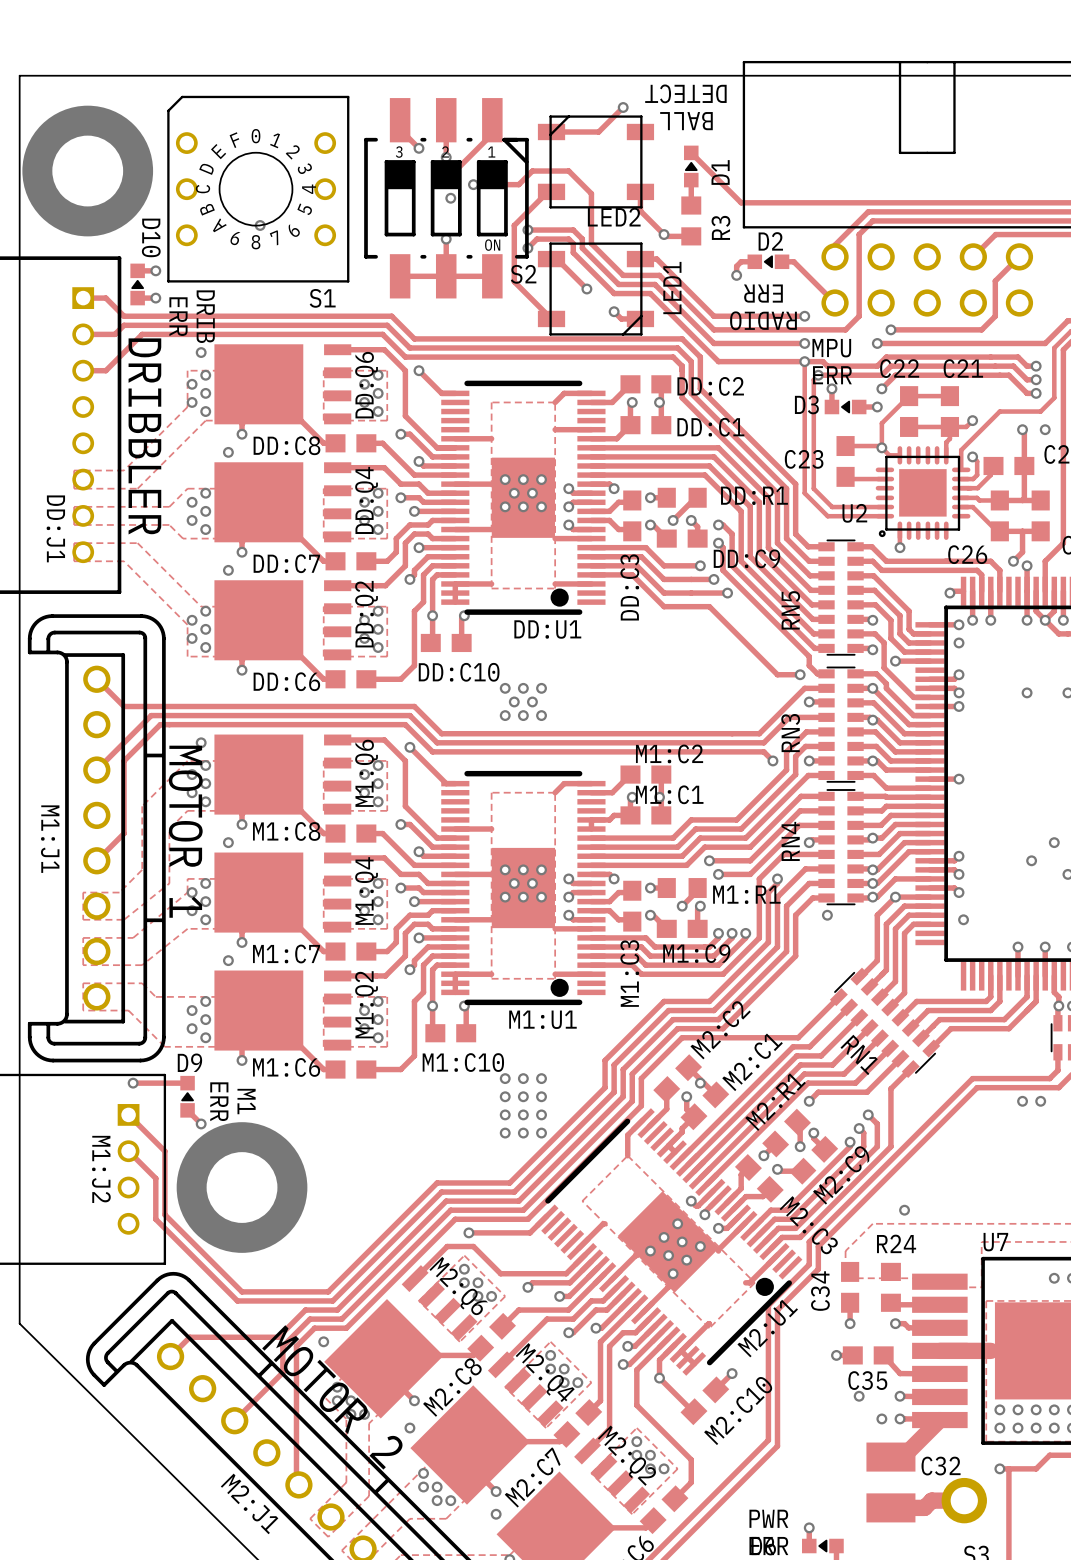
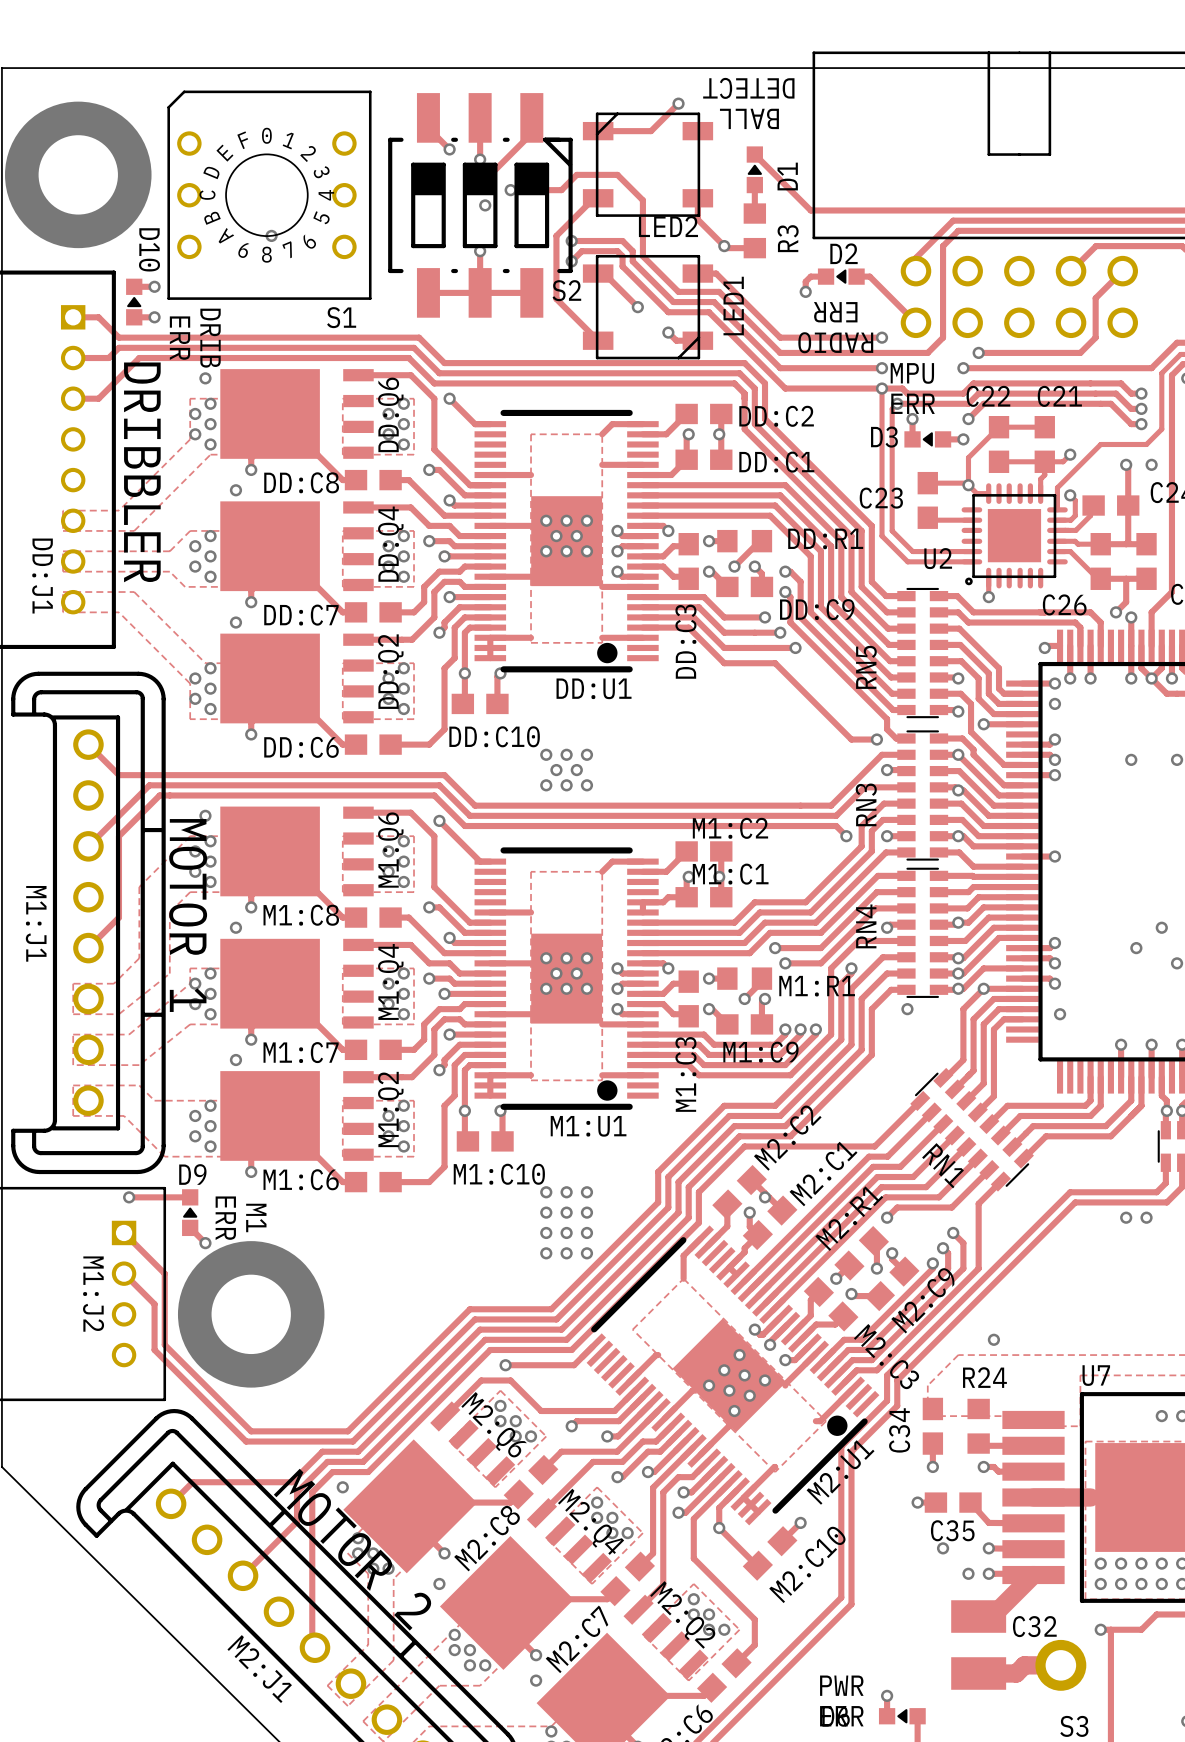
S2 text: 2 (445, 151) -> none
S2 text: 3 (399, 152) -> none
S2 text: 1 (491, 152) -> none
S2 text: ON (492, 245) -> none

